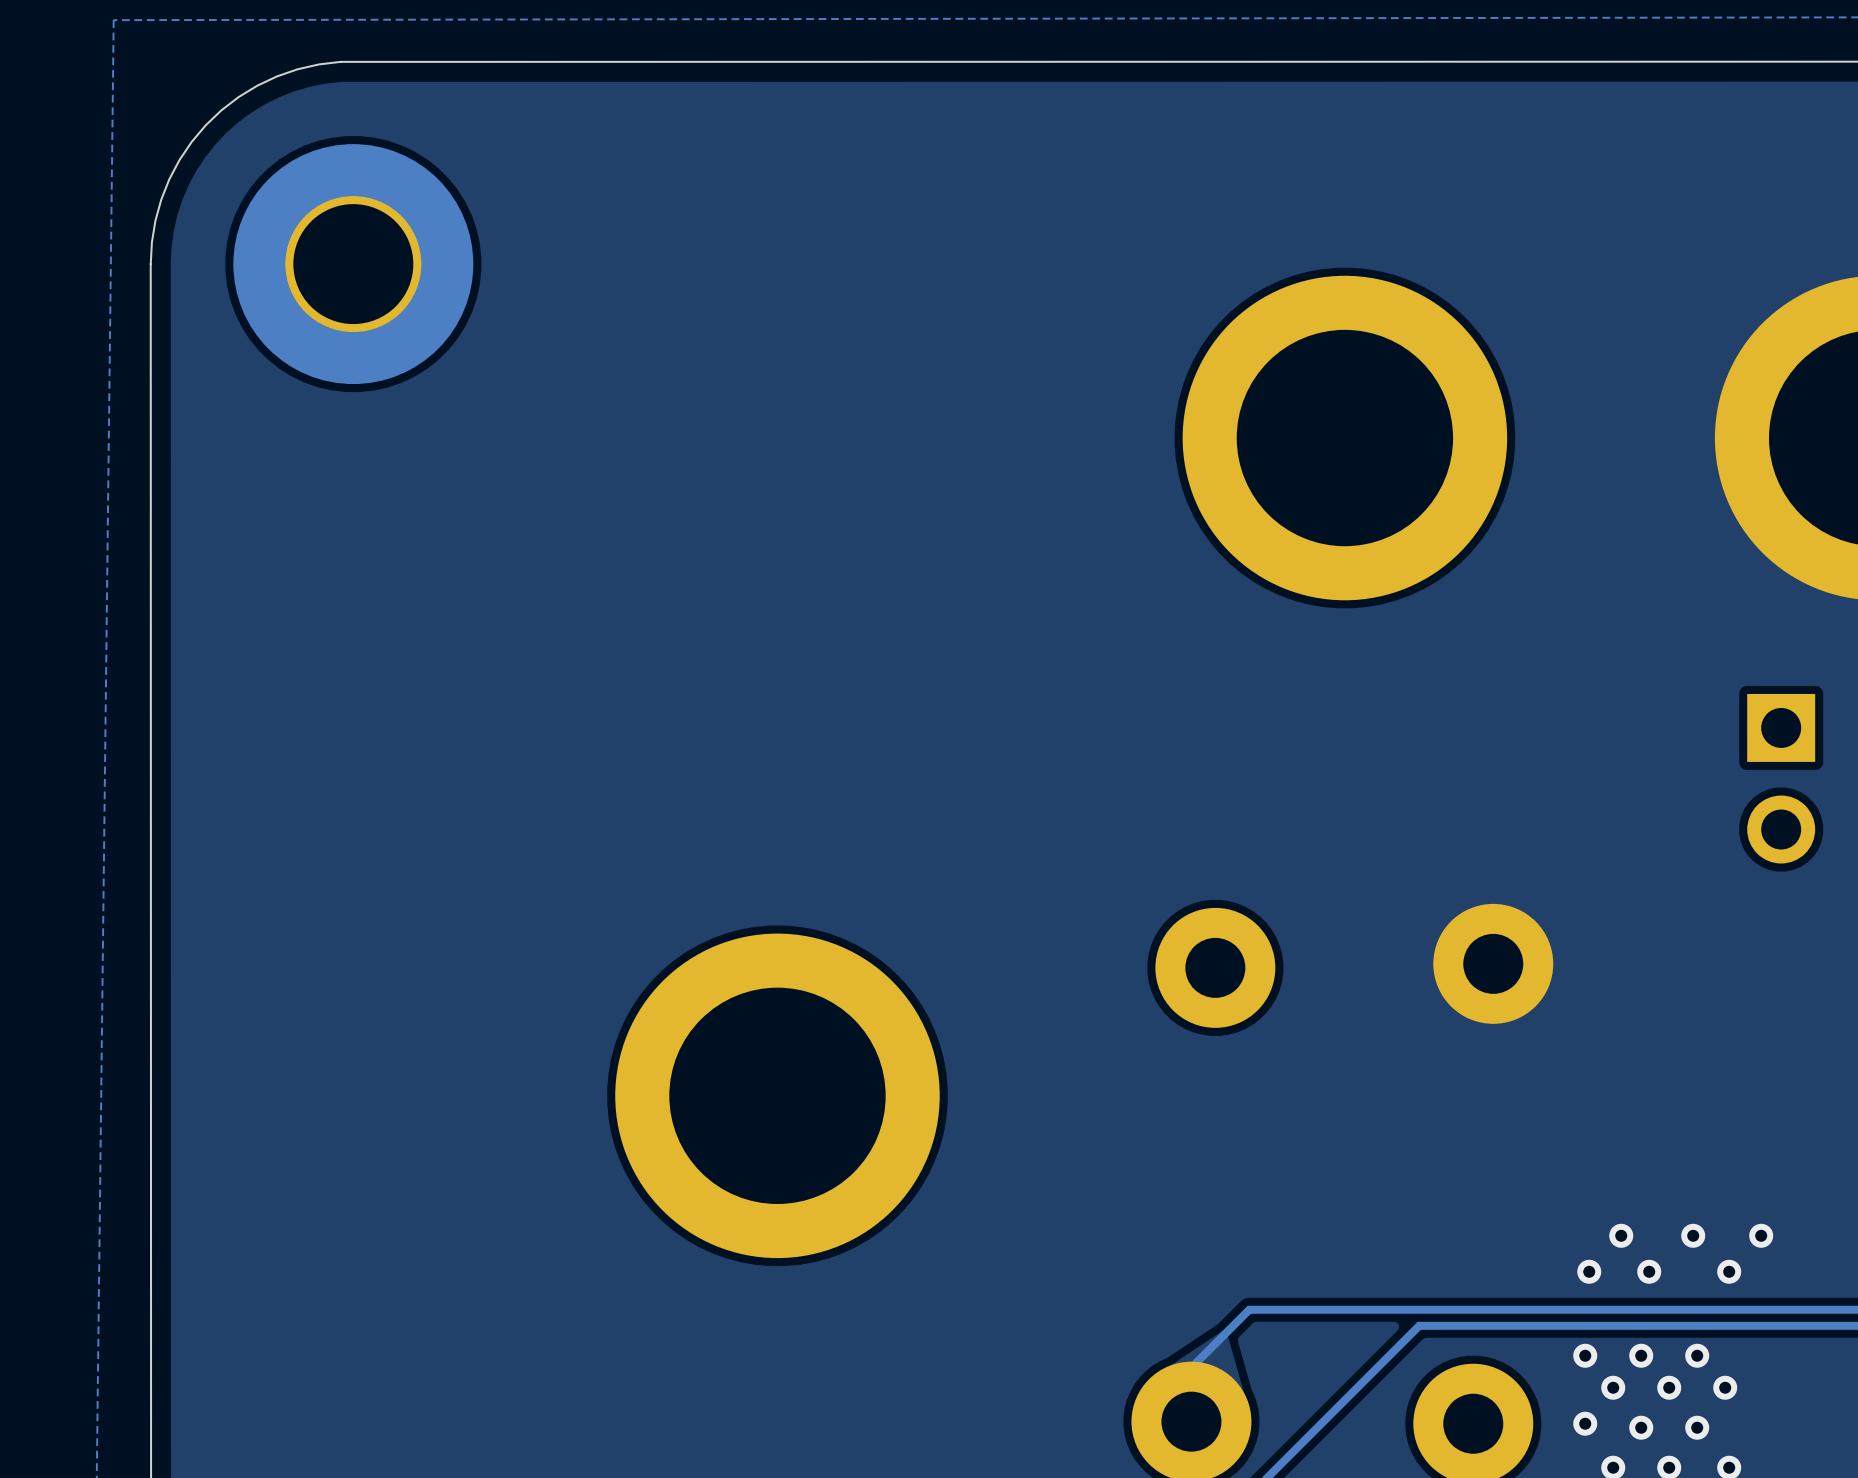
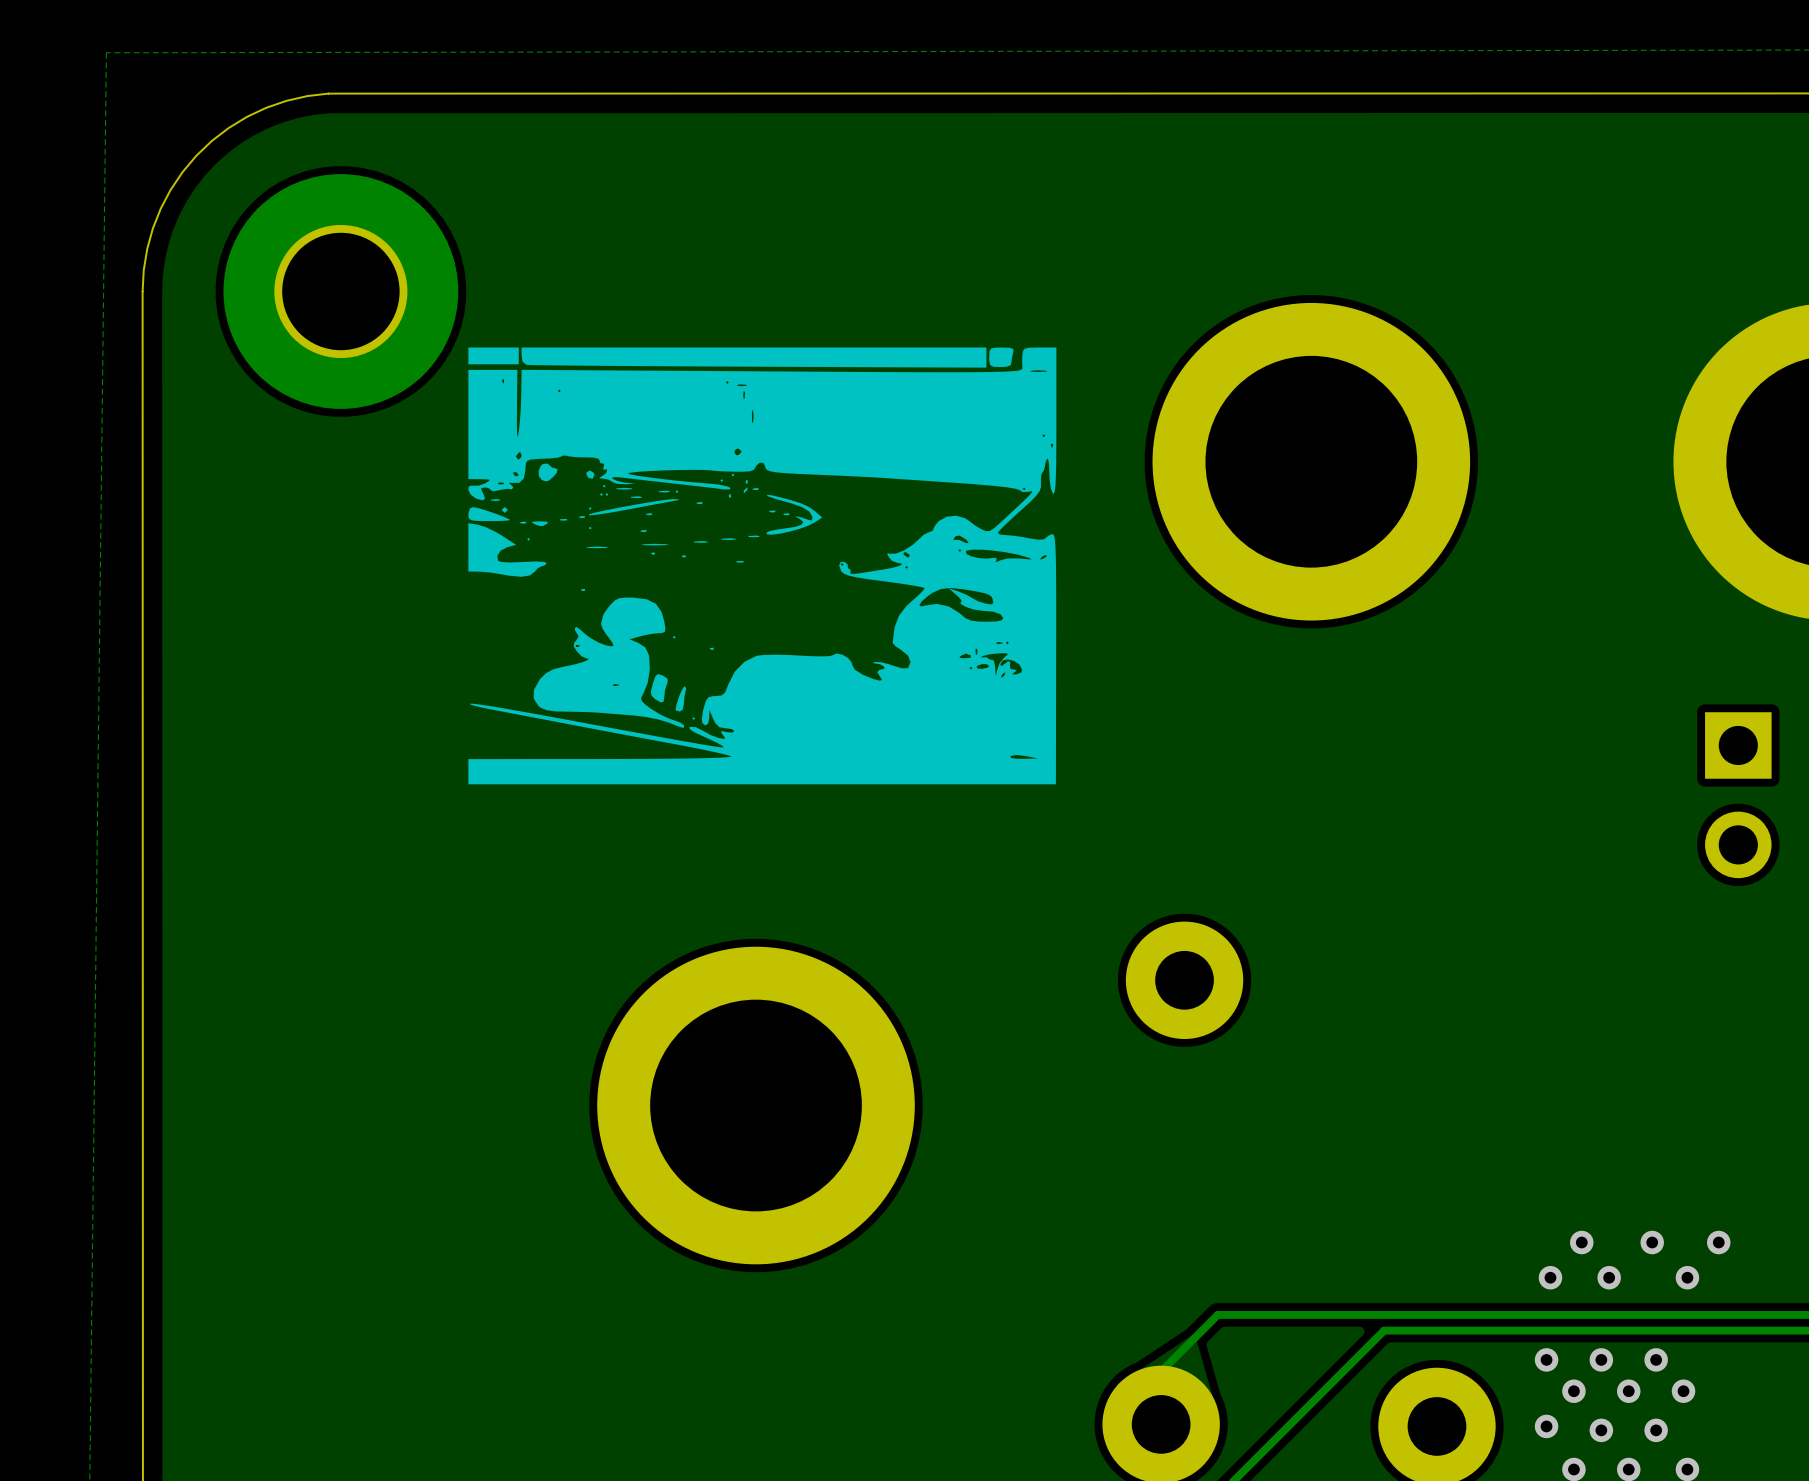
drawing: none -> [468, 347, 1057, 785]
part: (1493, 963) -> none

